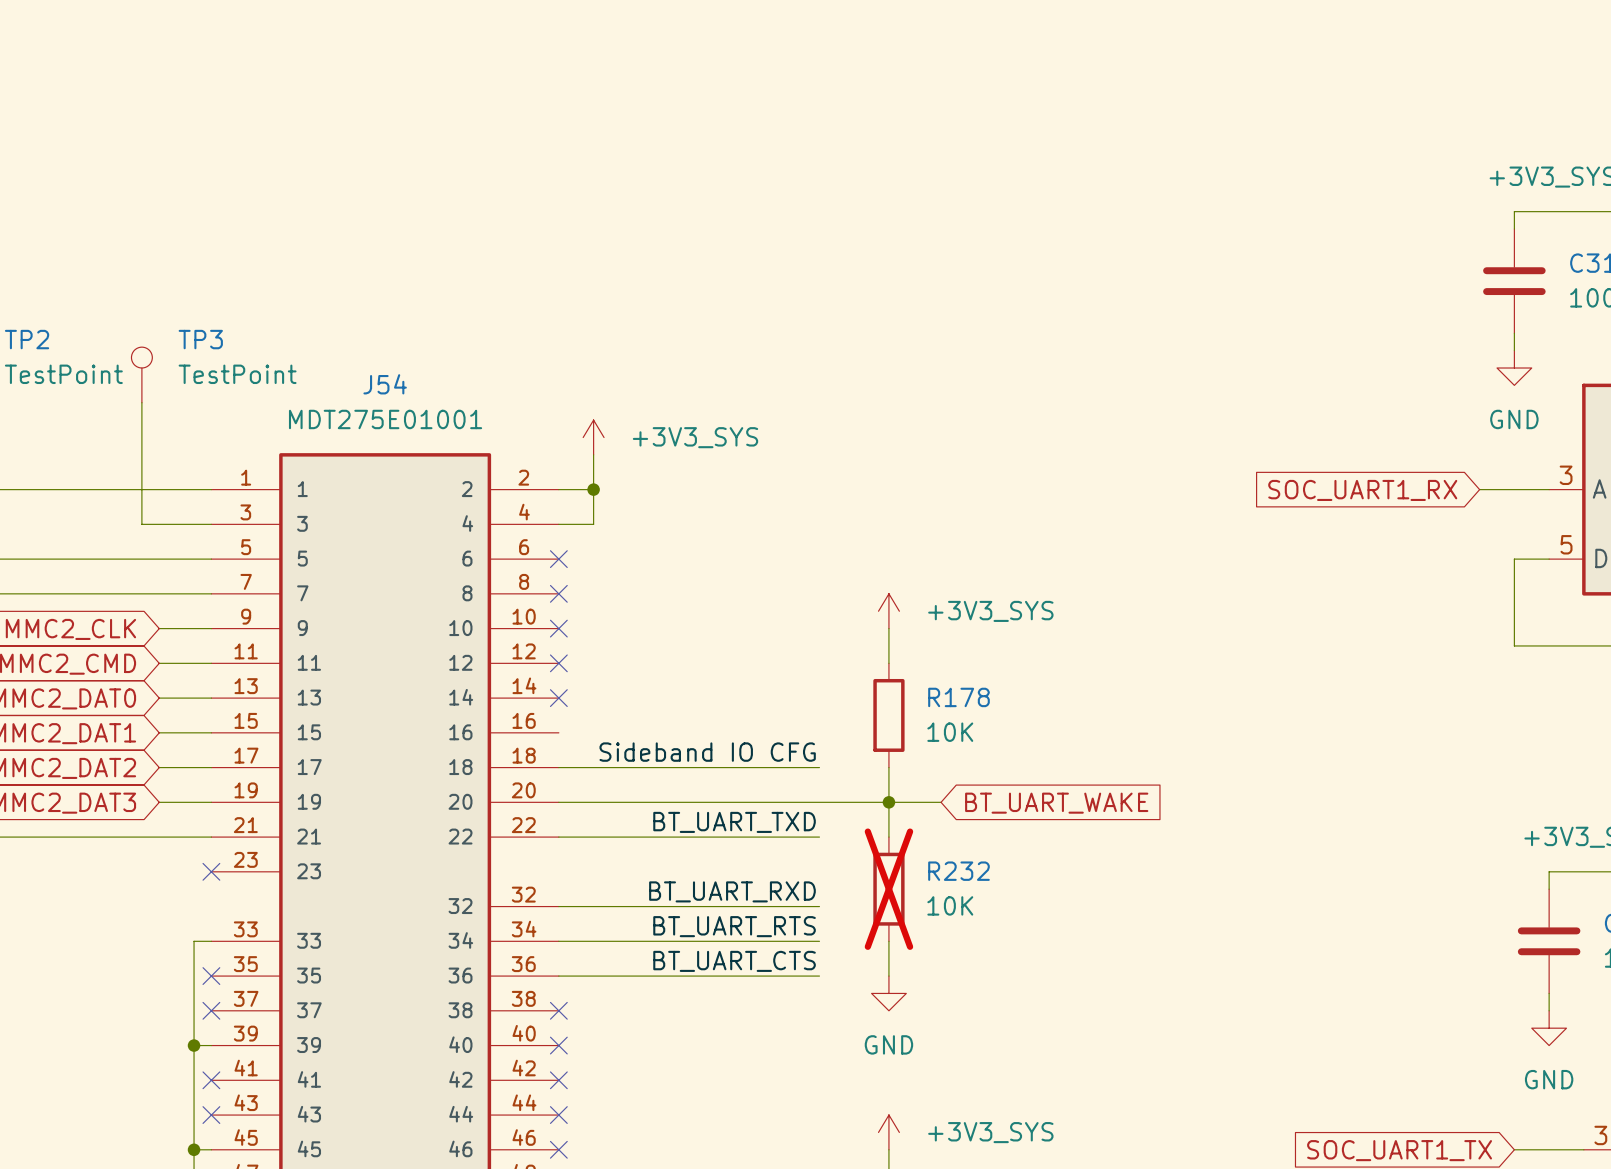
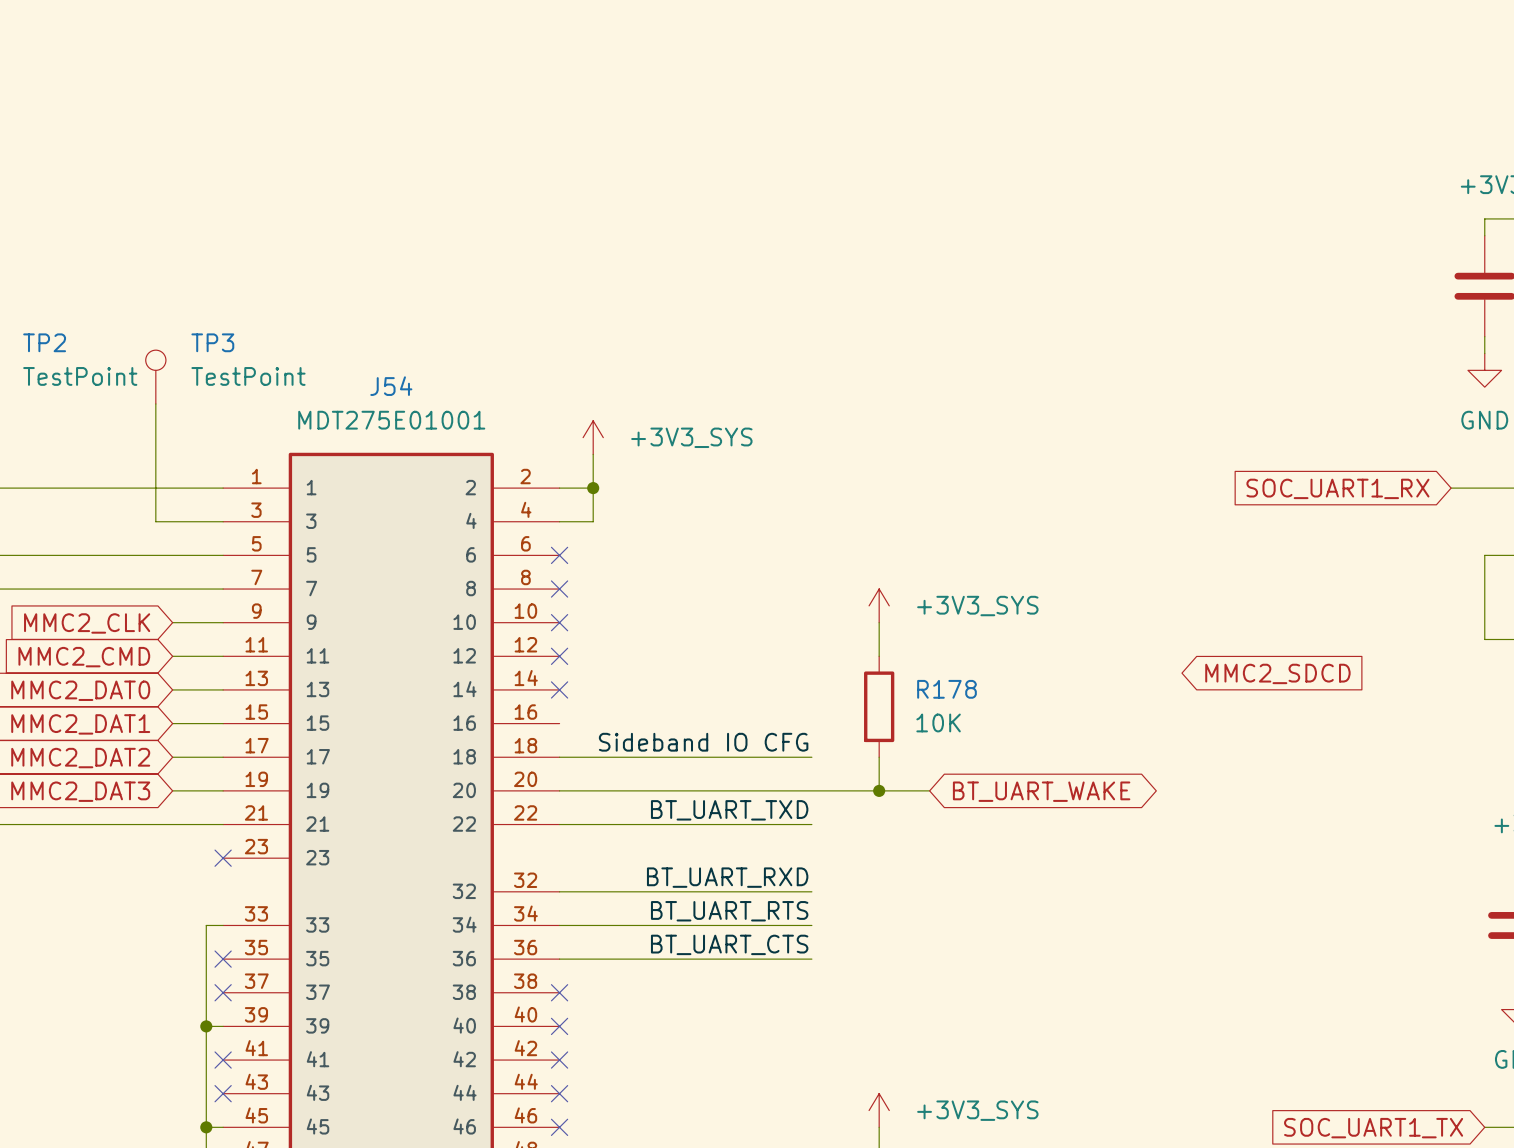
global label: none -> MMC2_SDCD (1277, 673)
wire: (888, 802) (888, 837) -> none
global label shape: input (1056, 803) -> bidirectional (1041, 791)
R232: 10K (888, 889) -> none
wire: (888, 941) (888, 976) -> none
power symbol: GND (888, 993) -> none

